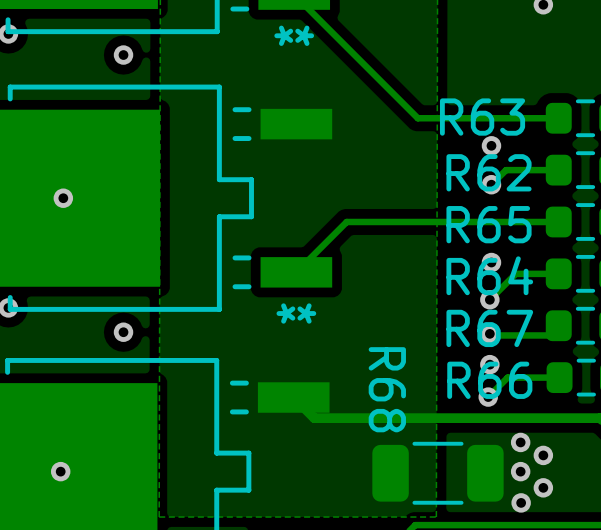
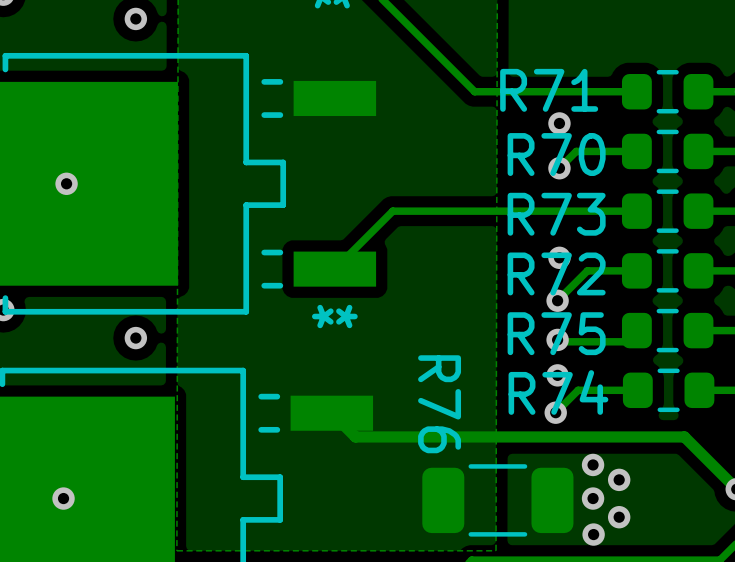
R63 name: R63 (482, 117) -> R71 (549, 90)
R62 name: R62 (489, 172) -> R70 (556, 154)
R65 name: R65 (489, 224) -> R73 (556, 214)
R64 name: R64 (489, 275) -> R72 (556, 273)
R67 name: R67 (489, 328) -> R75 (556, 333)
R66 name: R66 (489, 380) -> R74 (558, 392)
R68 name: R68 (387, 389) -> R76 (439, 404)

